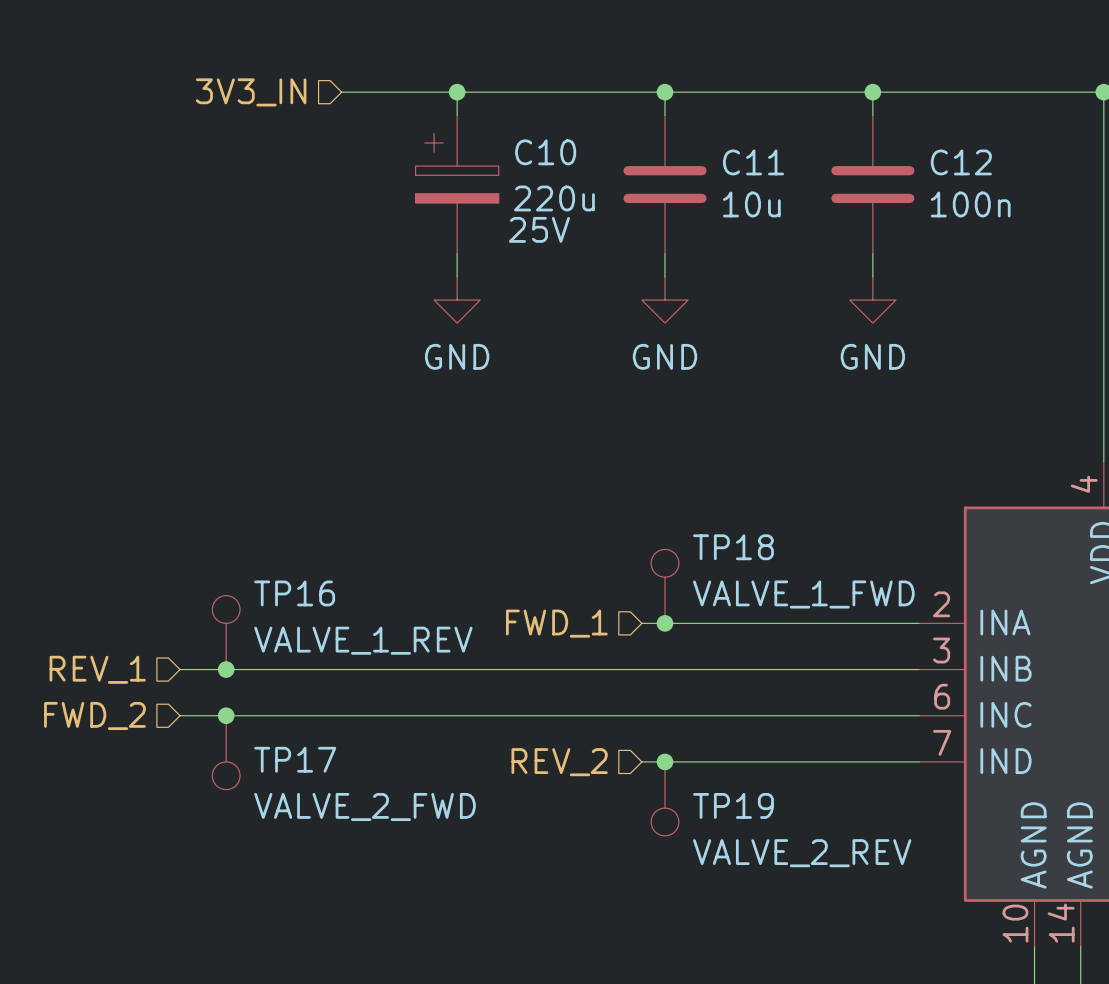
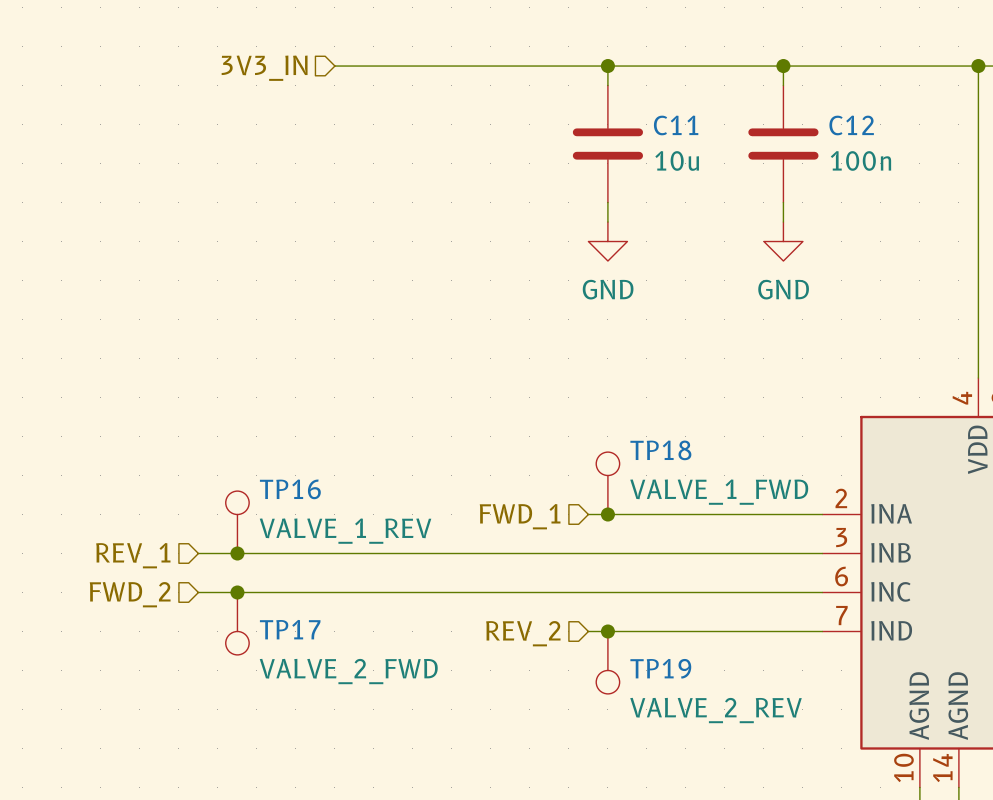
wire: (457, 92) (457, 115) -> none
junction: (457, 92) -> none
C10: 220u (457, 184) -> none
wire: (457, 253) (457, 276) -> none
power symbol: GND (457, 300) -> none

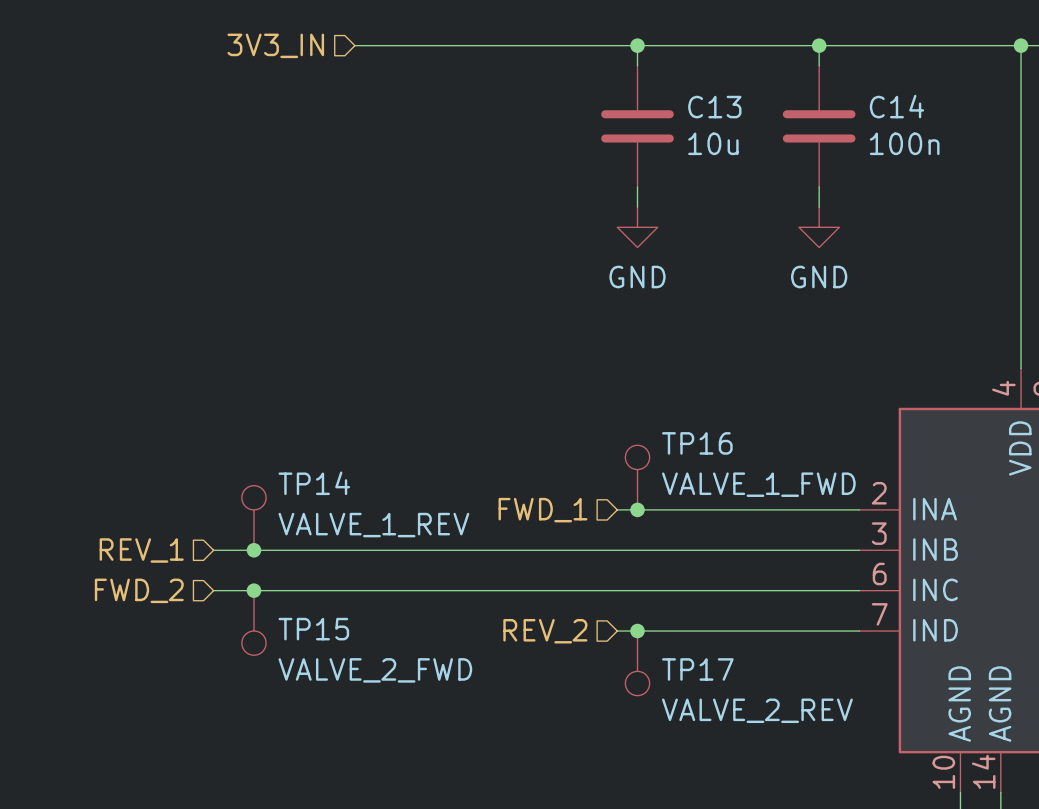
C11 name: C11 (676, 125) -> C13 (714, 107)
C12 name: C12 (851, 125) -> C14 (896, 106)
TP18 name: TP18 (660, 450) -> TP16 (697, 443)
TP16 name: TP16 (290, 489) -> TP14 (314, 483)
TP17 name: TP17 (290, 629) -> TP15 (313, 629)
TP19 name: TP19 (660, 668) -> TP17 (697, 669)

